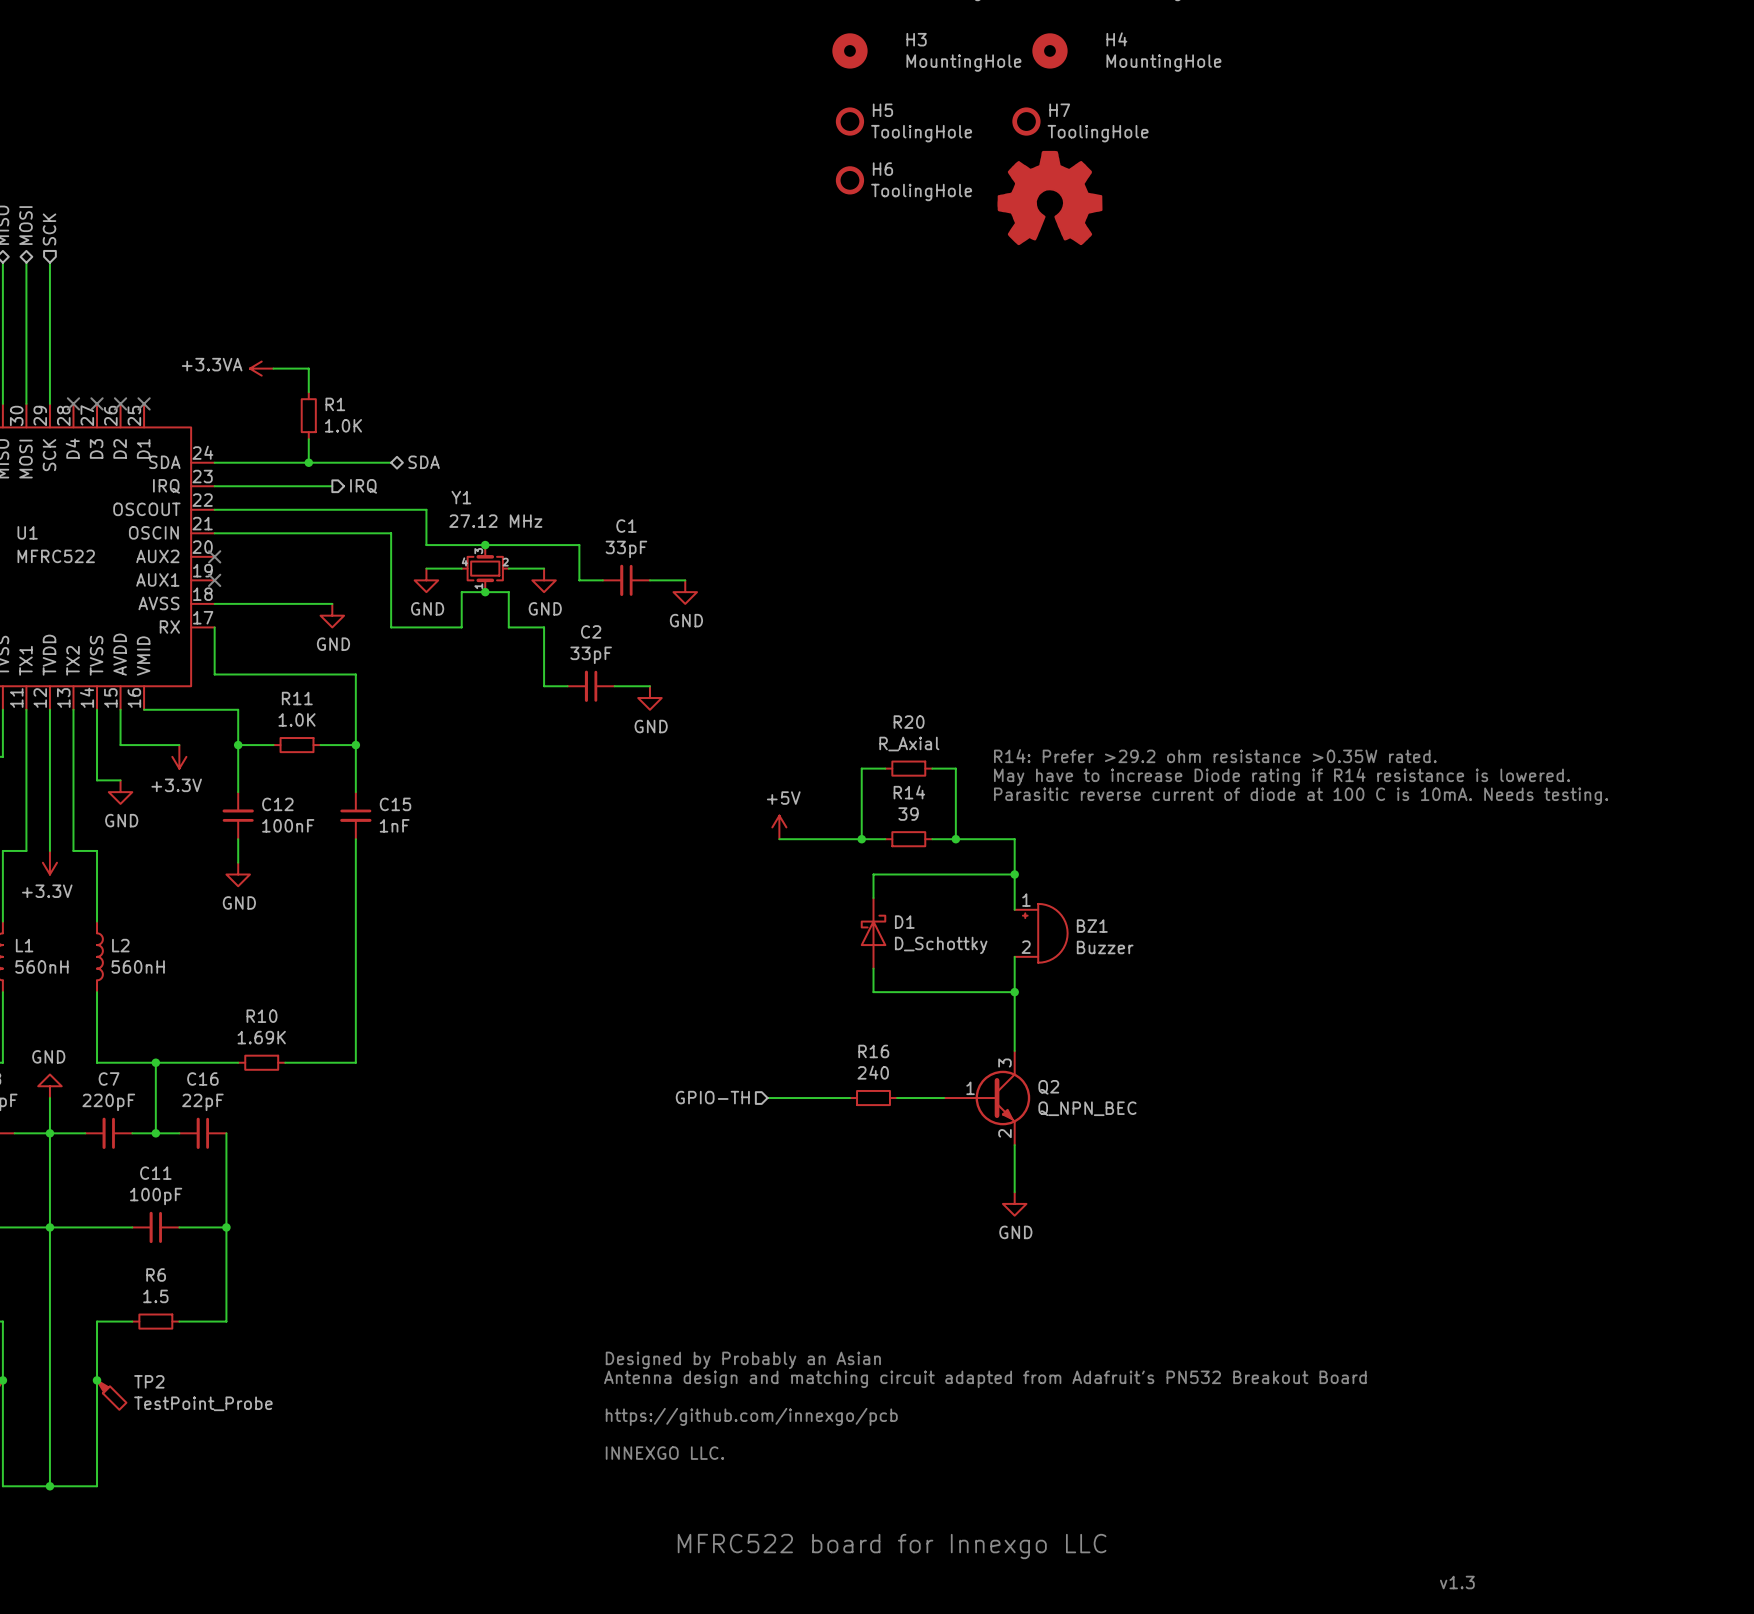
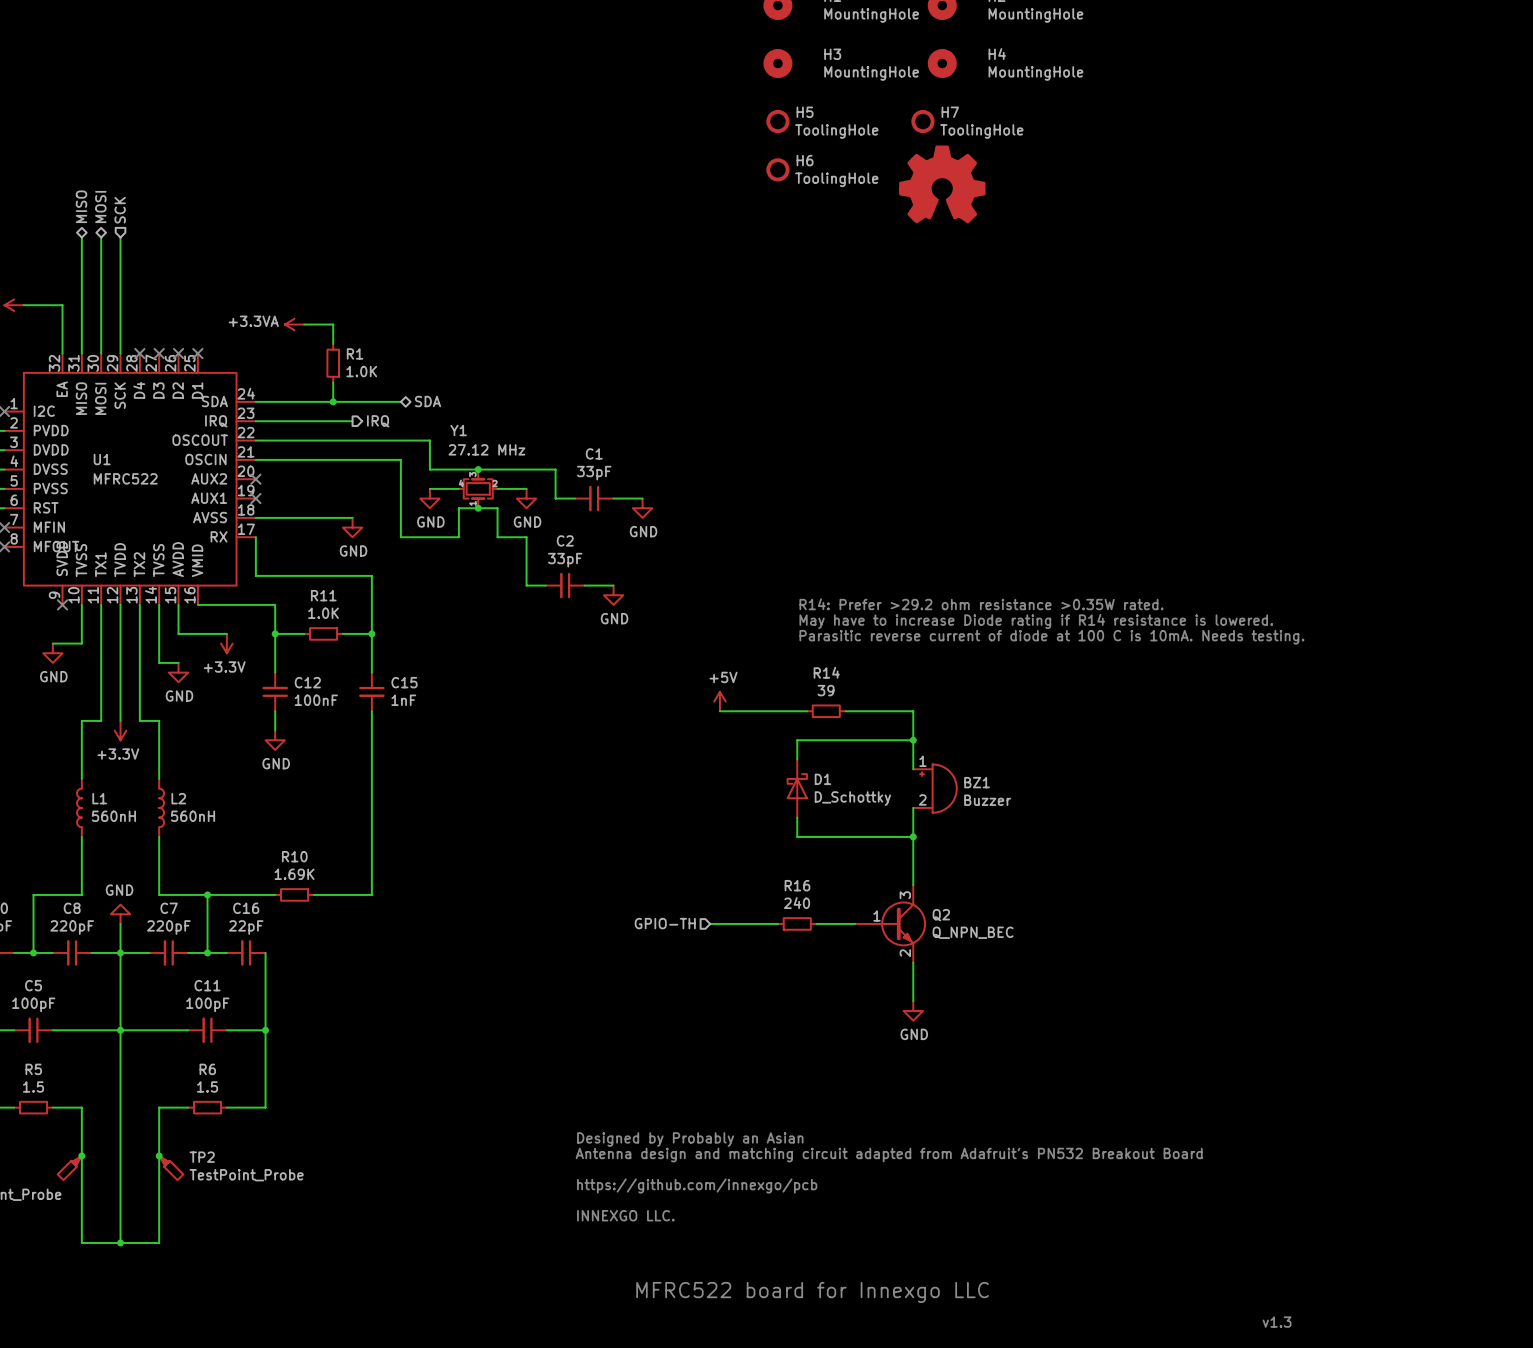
text position: R14: Prefer >29.2 ohm resistance >0.35W rated. (1215, 756) -> R14: Prefer >29.2 ohm resistance >0.35W rated. (981, 604)
wire: (885, 768) (861, 768) (861, 839) -> none
R20: R_Axial (908, 768) -> none
wire: (932, 768) (955, 768) (955, 839) -> none
text position: May have to increase Diode rating if R14 resistance is lowered. (1282, 777) -> May have to increase Diode rating if R14 resistance is lowered. (1036, 621)
text position: Parasitic reverse current of diode at 100 C is 10mA. Needs testing. (1301, 796) -> Parasitic reverse current of diode at 100 C is 10mA. Needs testing. (1051, 637)
junction: (861, 839) -> none
junction: (955, 839) -> none

